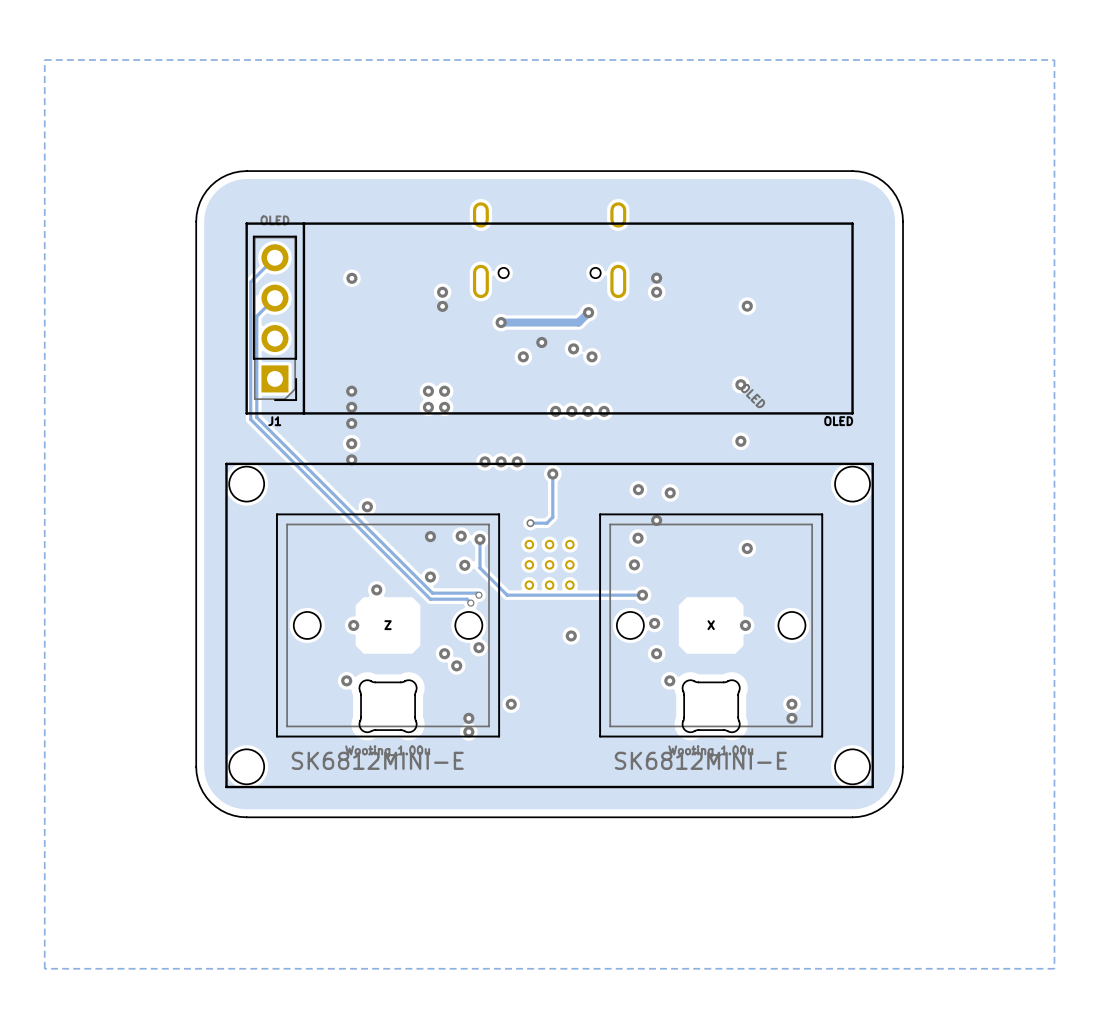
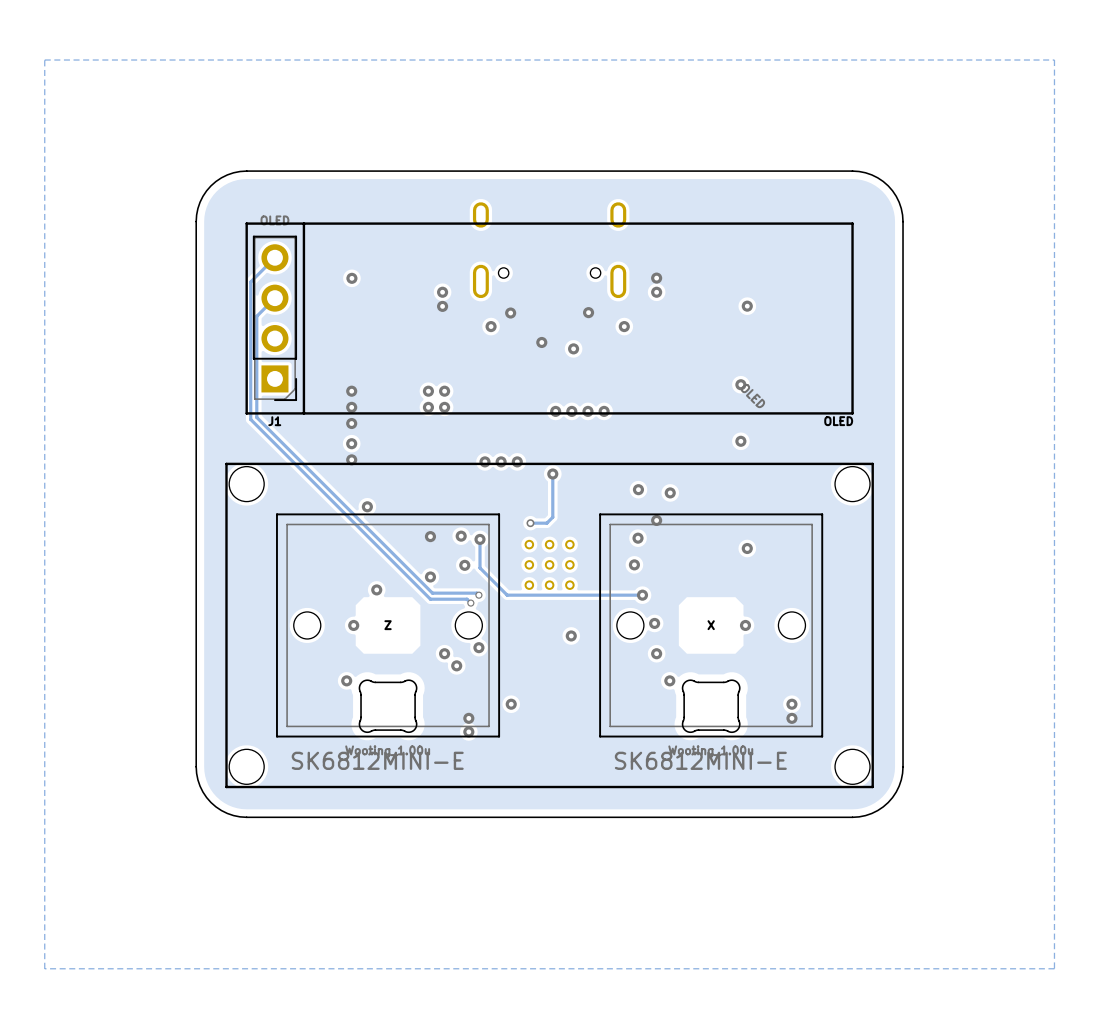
track: (588, 312) (578, 322) (501, 322) -> none
via: none -> (510, 313)
via: (501, 322) -> none
via: none -> (491, 326)
via: (523, 356) -> none
via position: (592, 356) -> (624, 326)

